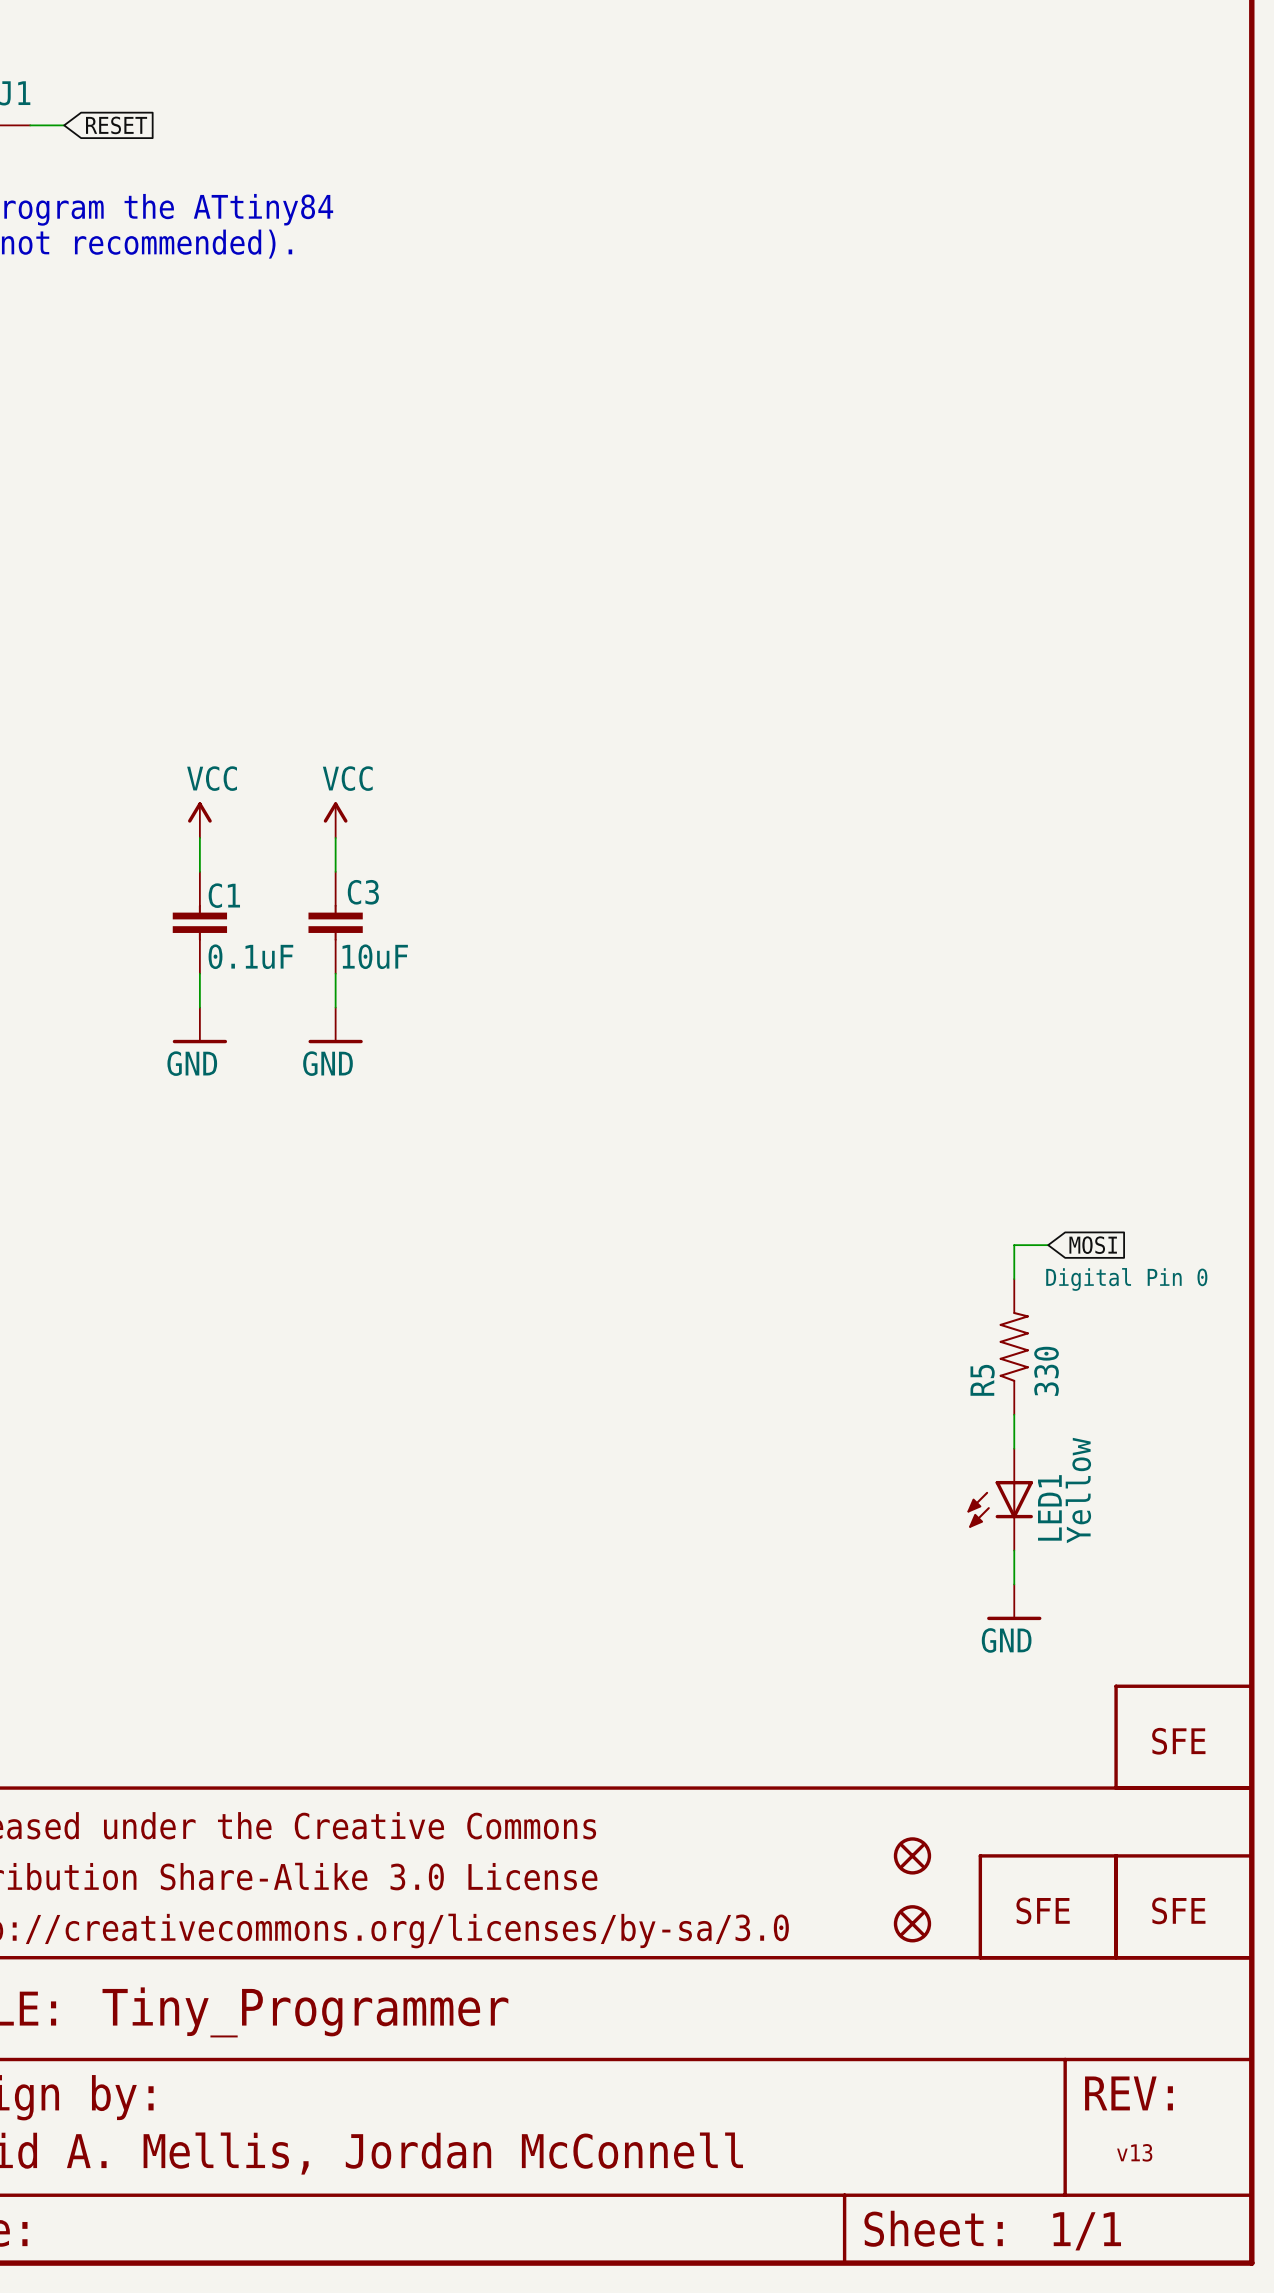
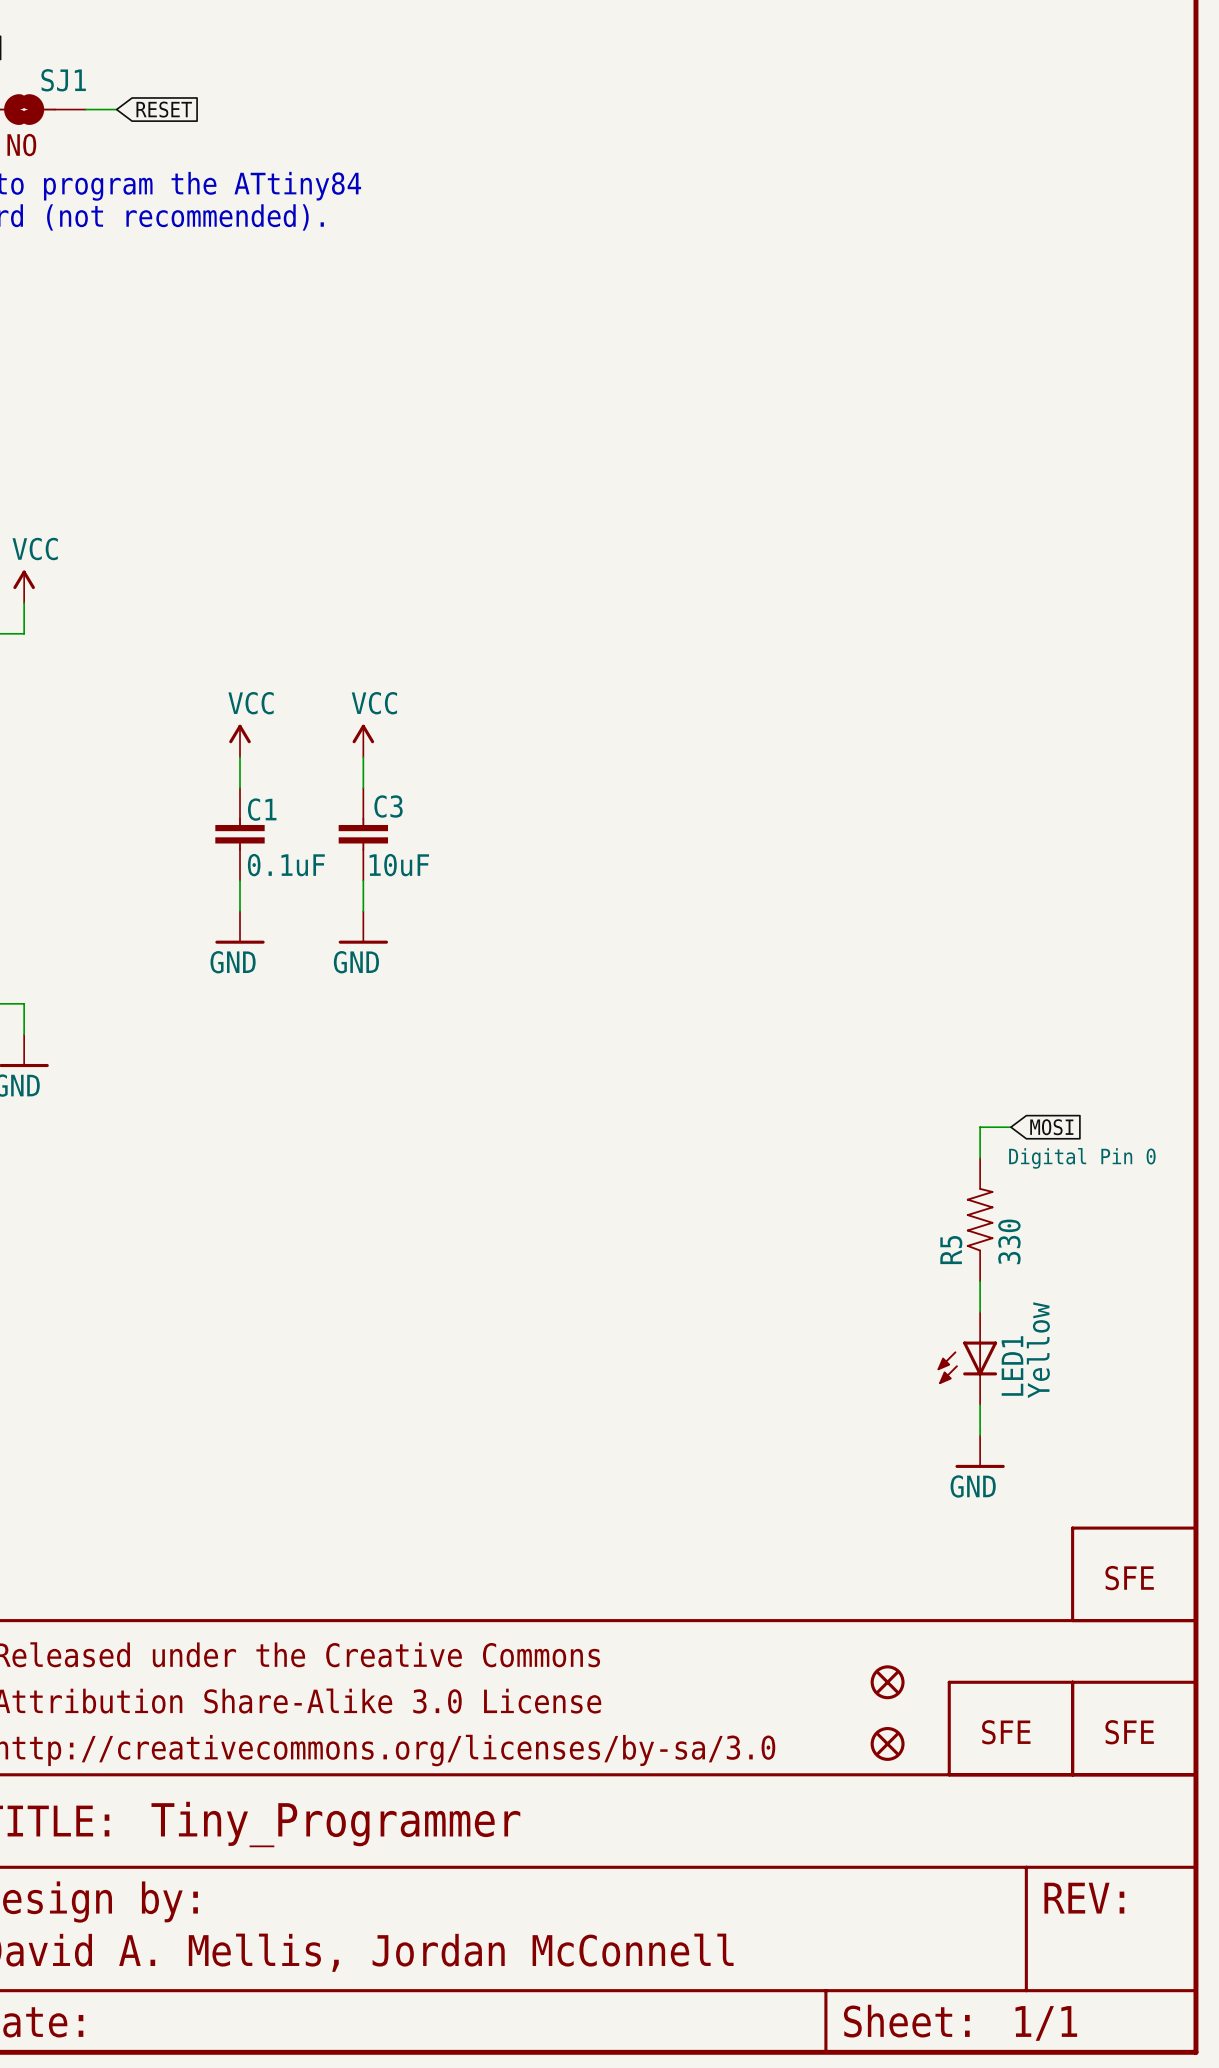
text: v13 (1134, 2152) -> none

